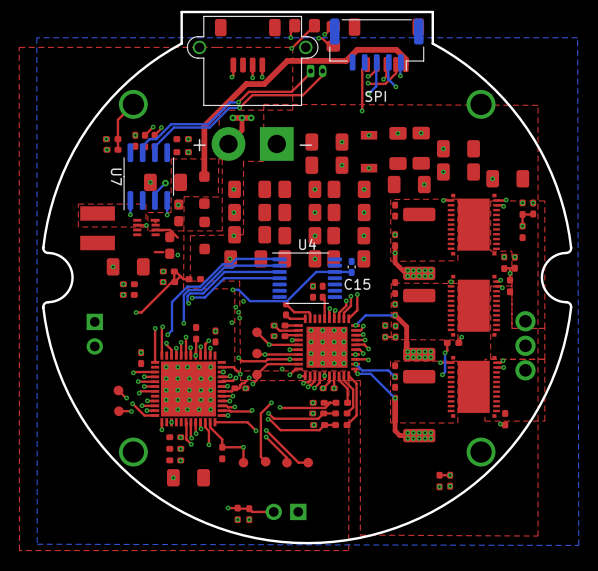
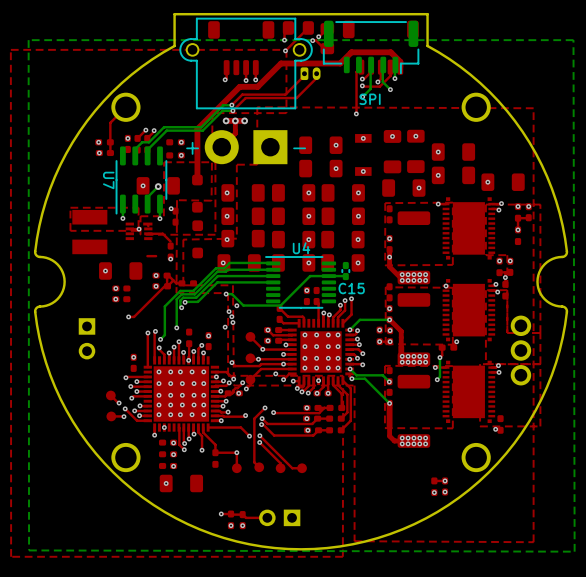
part footprint: [174, 199, 184, 227] -> [172, 207, 179, 226]
part footprint: [165, 231, 175, 259] -> [167, 242, 174, 261]

